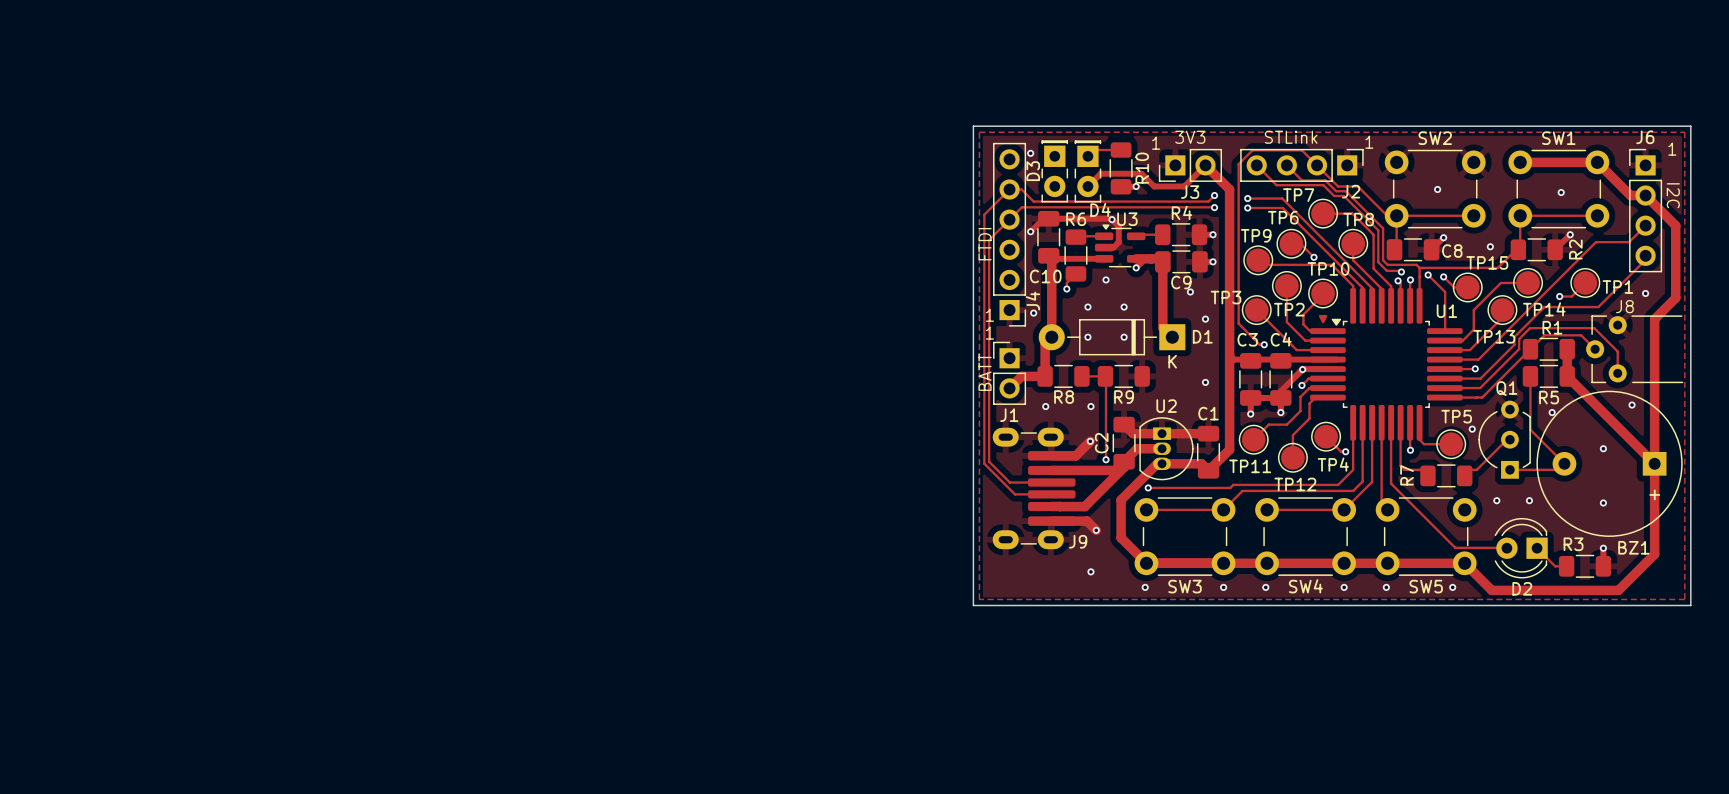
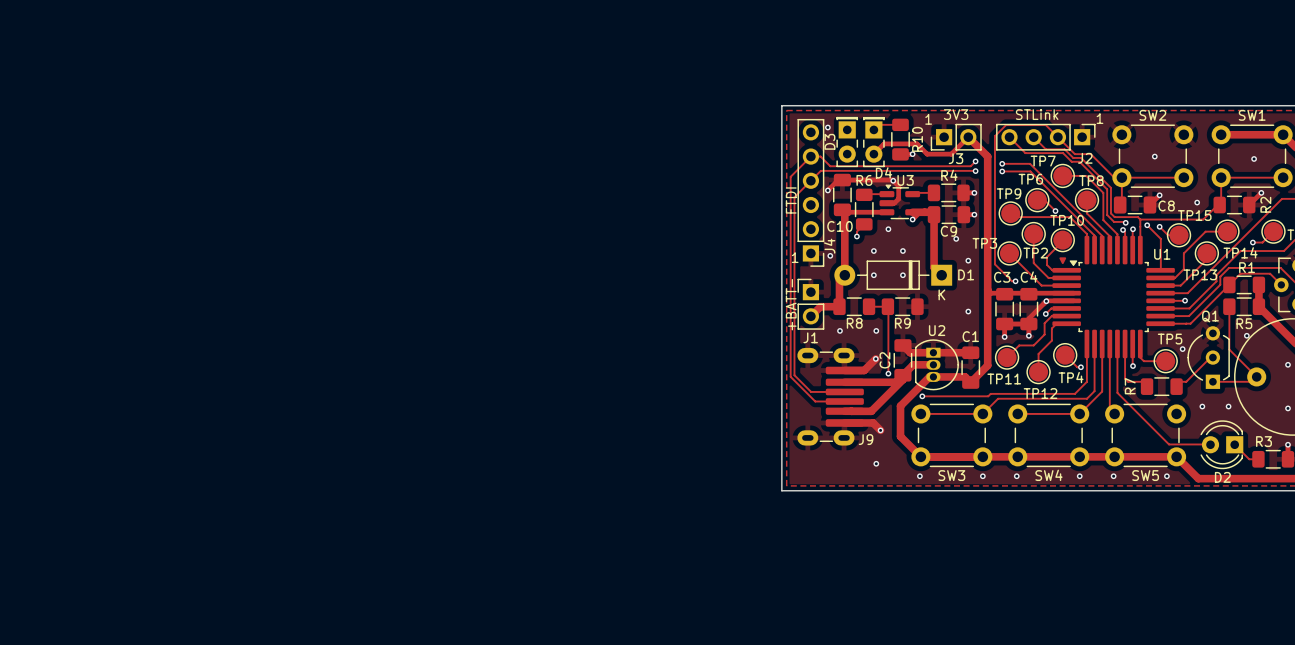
text: 1 (989, 333) -> none
text: none -> - (792, 283)
text: none -> + (792, 326)

